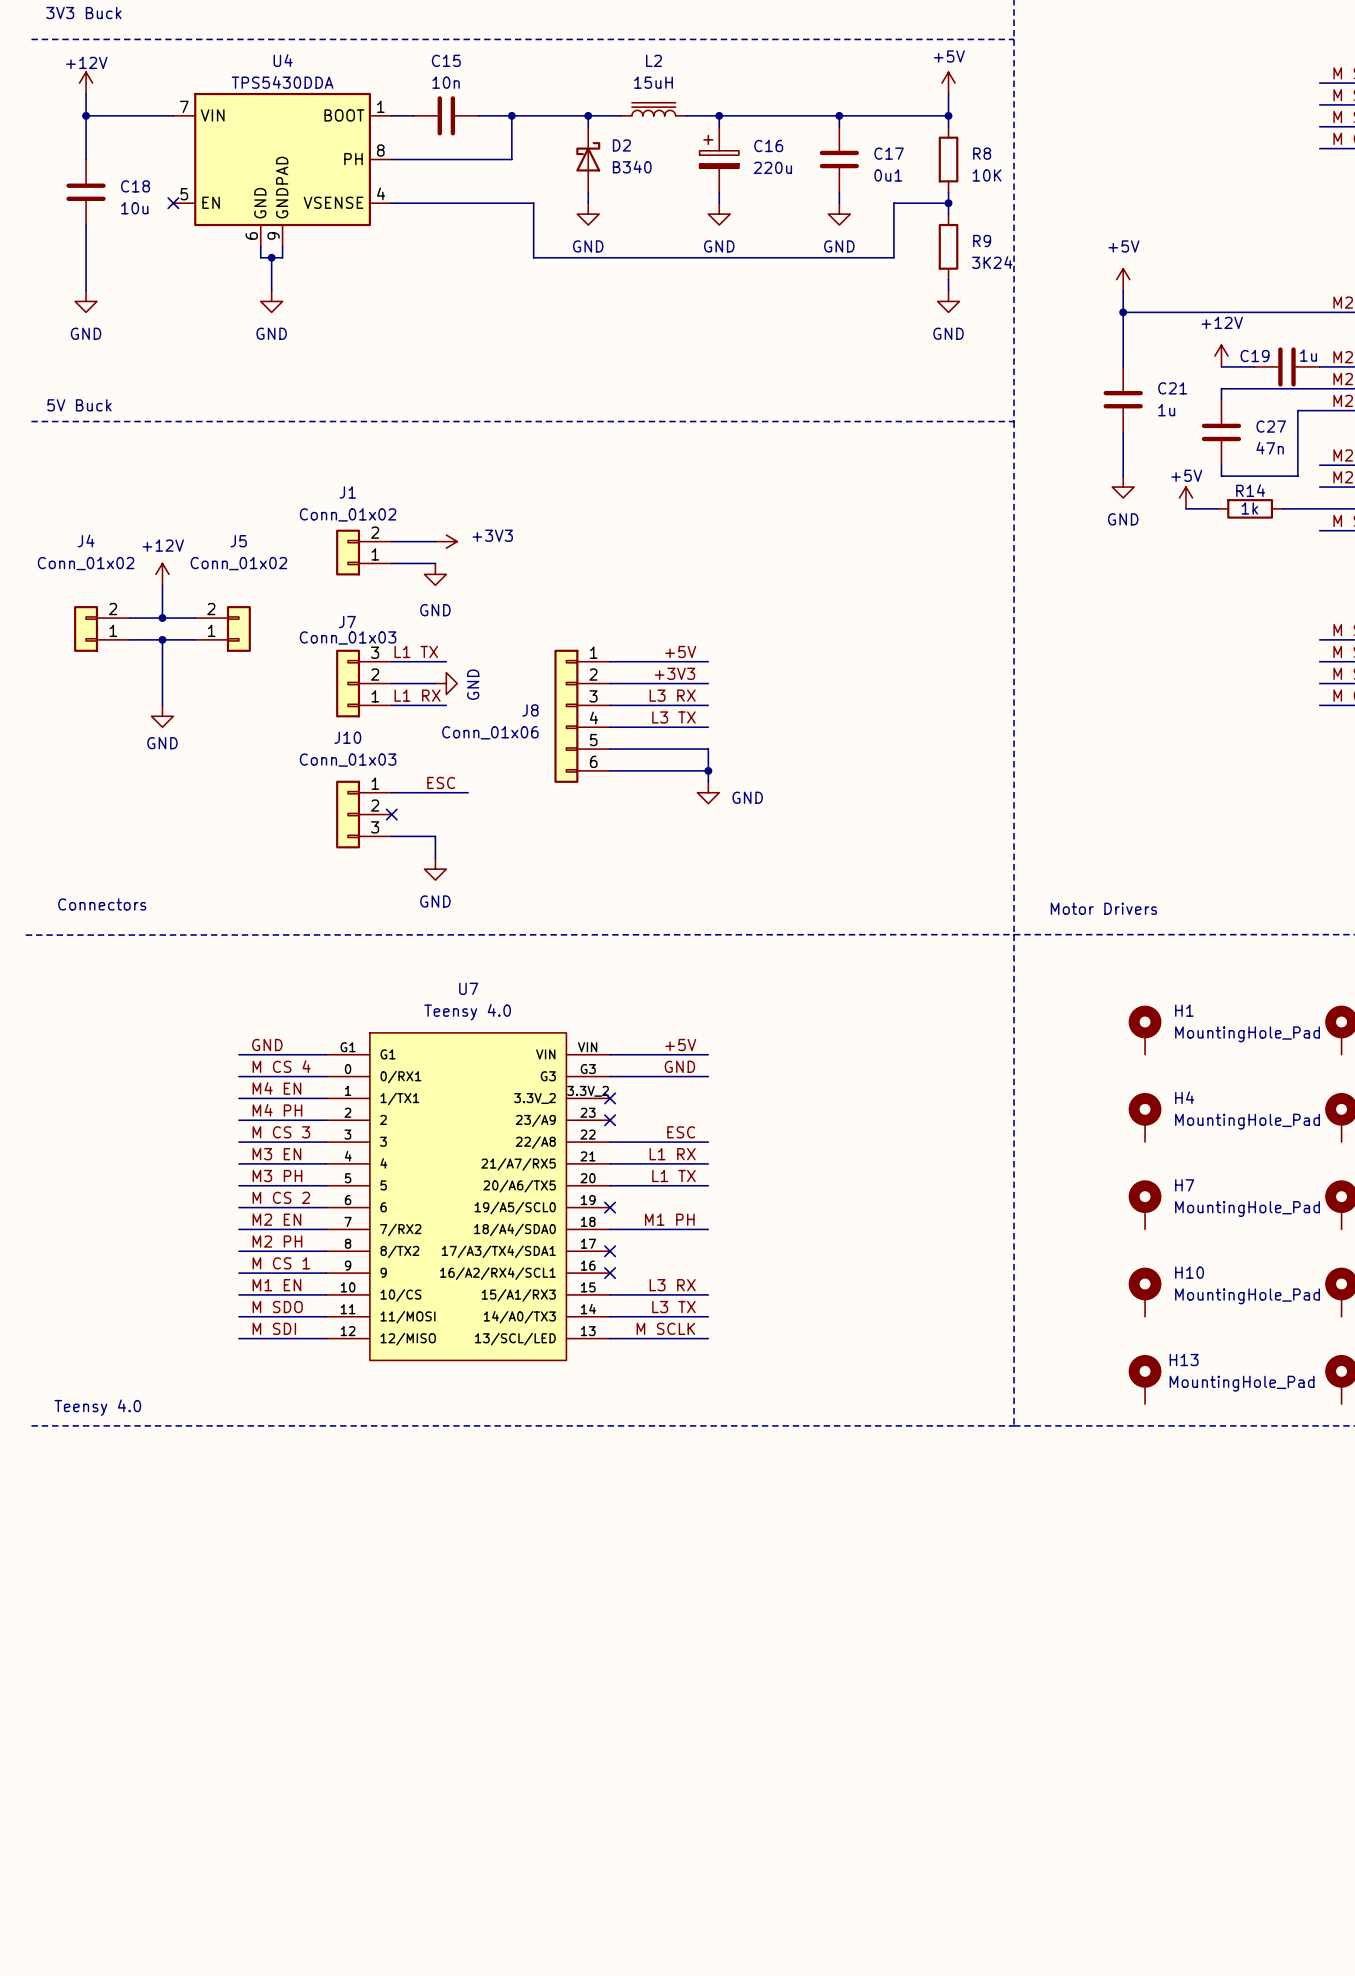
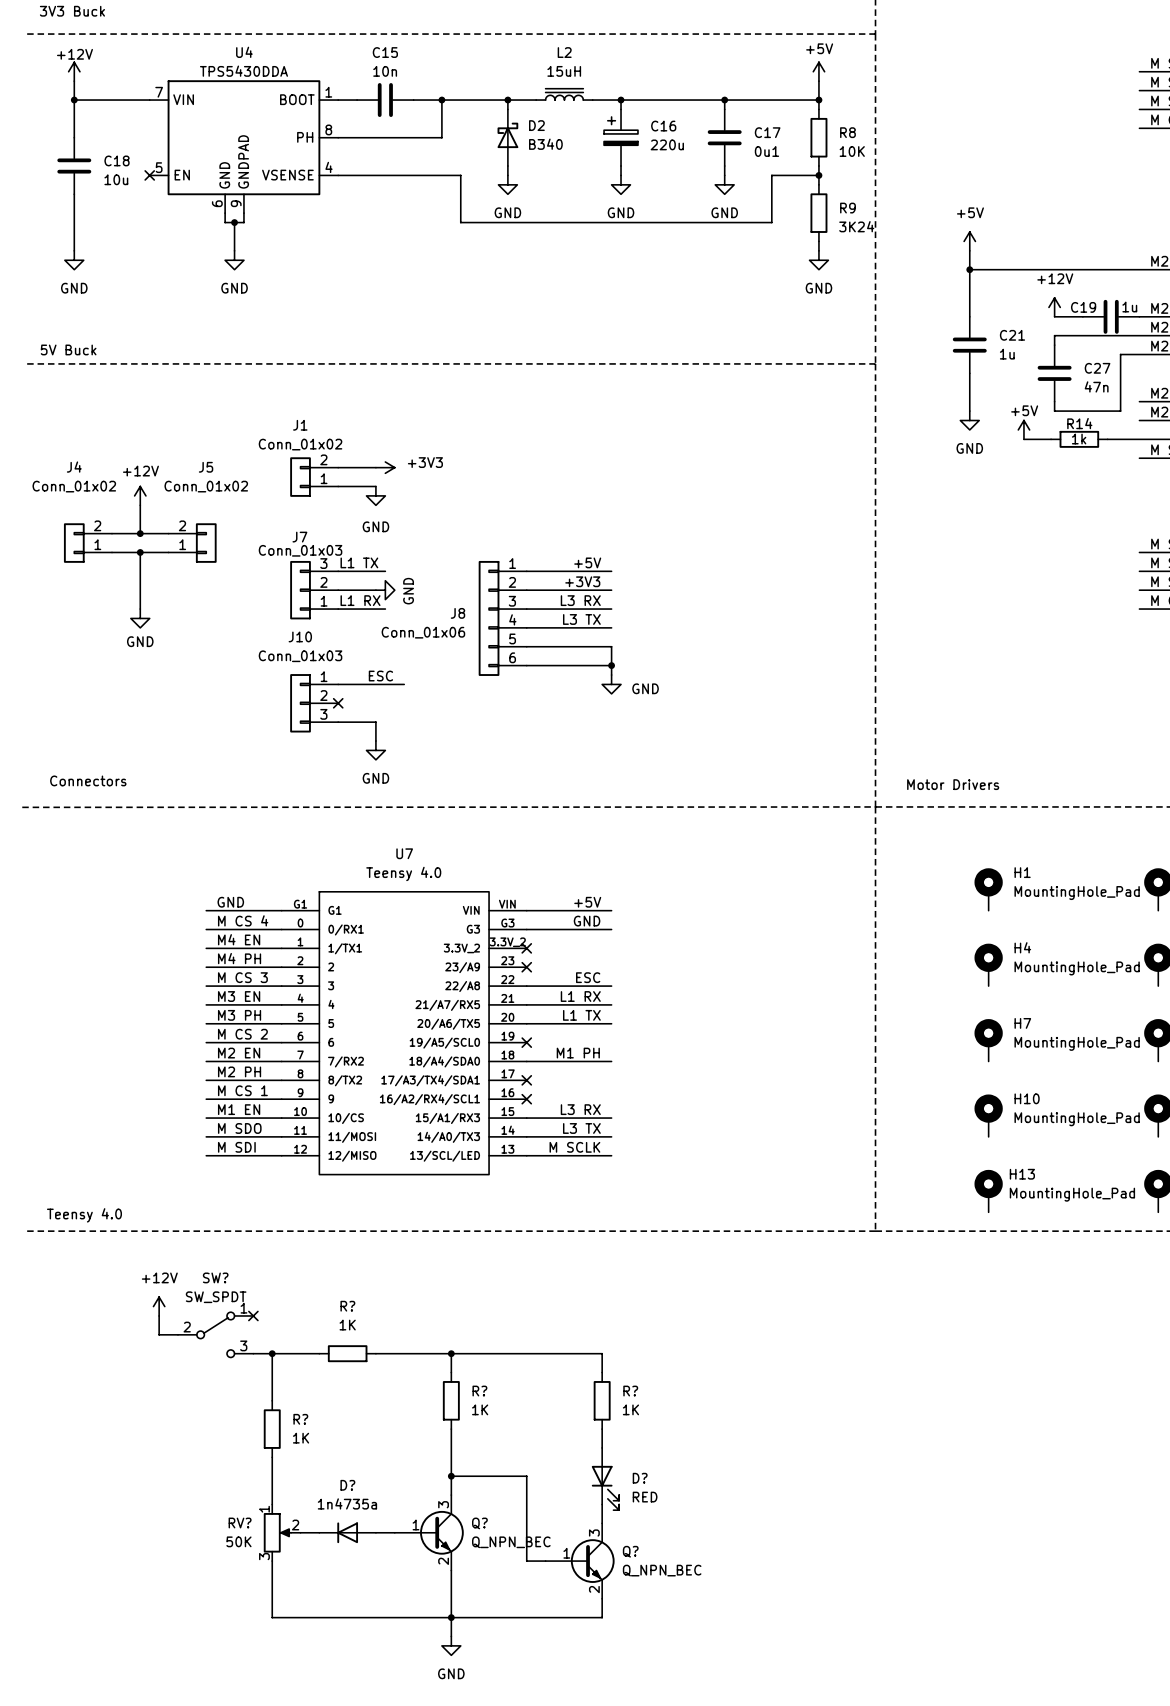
power symbol: none -> +12V (159, 1306)
wire: none -> (159, 1315) (159, 1334) (177, 1334)
no-connect mark: none -> (253, 1315)
SW?: none -> SW_SPDT (215, 1334)
wire: none -> (253, 1353) (319, 1353)
wire: none -> (272, 1353) (272, 1400)
junction: none -> (272, 1353)
R?: none -> 1K (347, 1353)
wire: none -> (375, 1353) (602, 1353) (602, 1372)
wire: none -> (451, 1353) (451, 1372)
junction: none -> (451, 1353)
R?: none -> 1K (451, 1400)
R?: none -> 1K (602, 1400)
R?: none -> 1K (272, 1429)
wire: none -> (451, 1429) (451, 1495)
wire: none -> (602, 1429) (602, 1447)
wire: none -> (272, 1457) (272, 1504)
wire: none -> (451, 1476) (526, 1476) (526, 1561) (545, 1561)
junction: none -> (451, 1476)
D?: none -> RED (605, 1479)
wire: none -> (602, 1504) (602, 1523)
RV?: none -> 50K (282, 1532)
wire: none -> (300, 1532) (319, 1532)
D?: none -> 1n4735a (347, 1532)
wire: none -> (375, 1532) (394, 1532)
Q?: none -> Q_NPN_BEC (429, 1532)
wire: none -> (272, 1561) (272, 1617) (602, 1617) (602, 1598)
Q?: none -> Q_NPN_BEC (580, 1561)
wire: none -> (451, 1570) (451, 1636)
junction: none -> (451, 1617)
power symbol: none -> GND (451, 1645)

